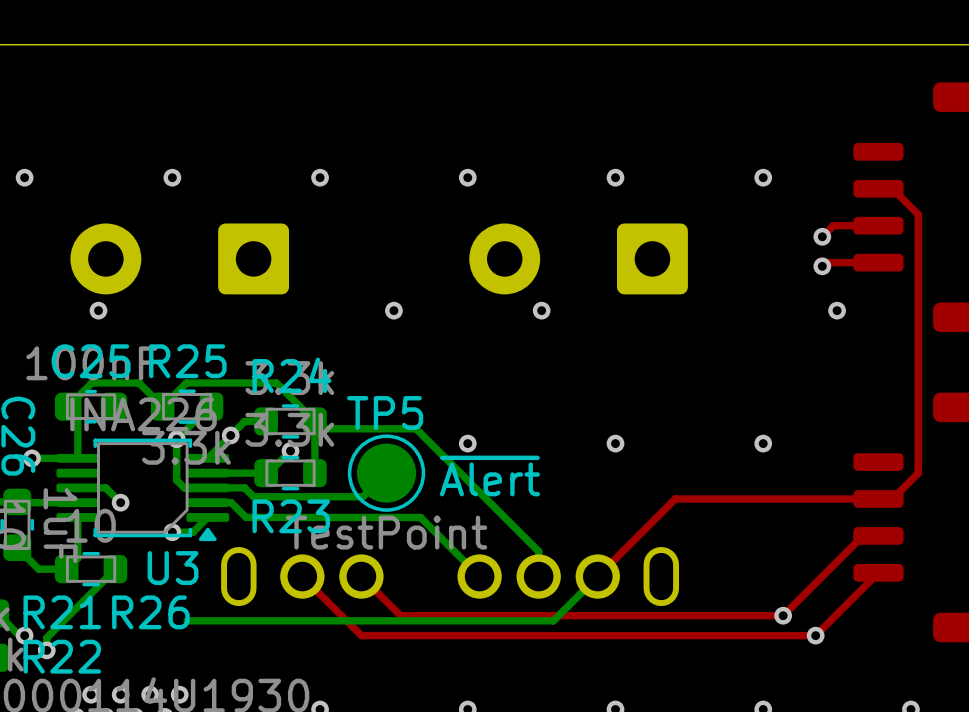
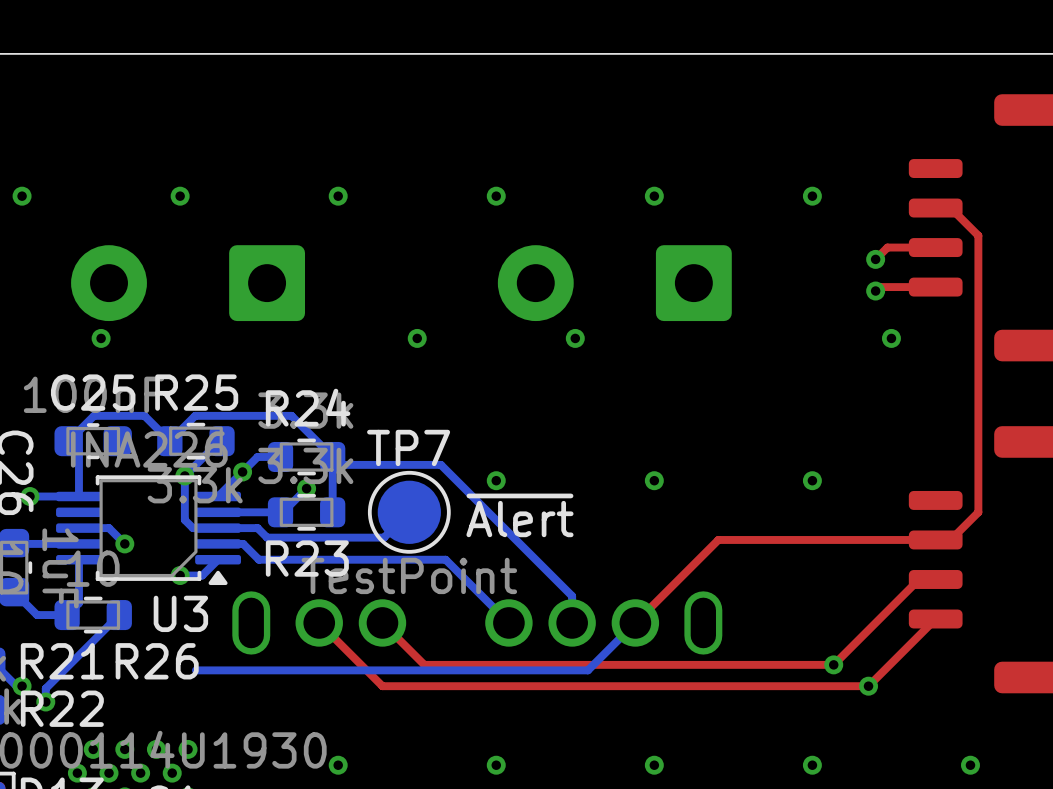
TP5 name: TP5 (385, 413) -> TP7 (408, 447)

